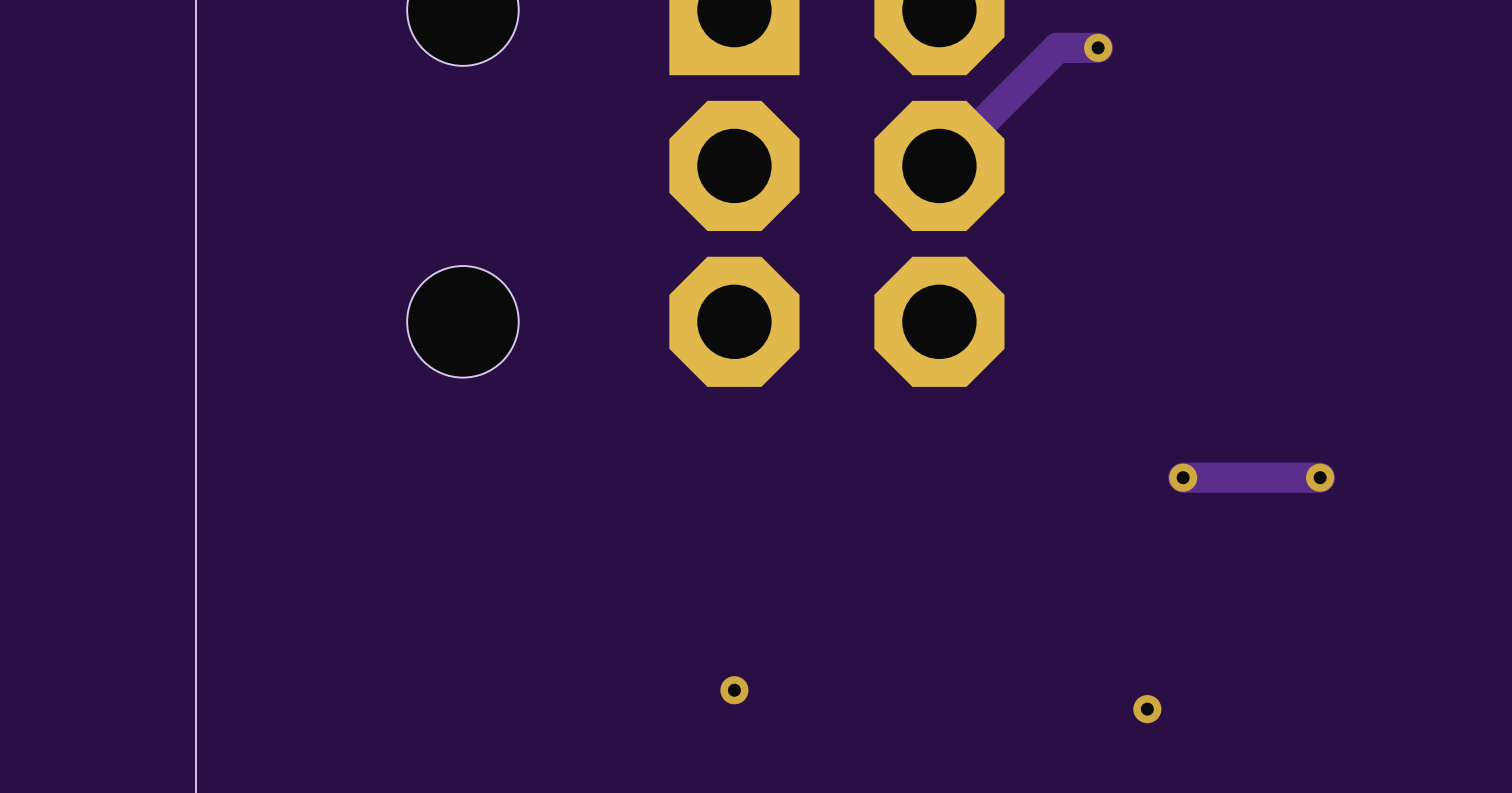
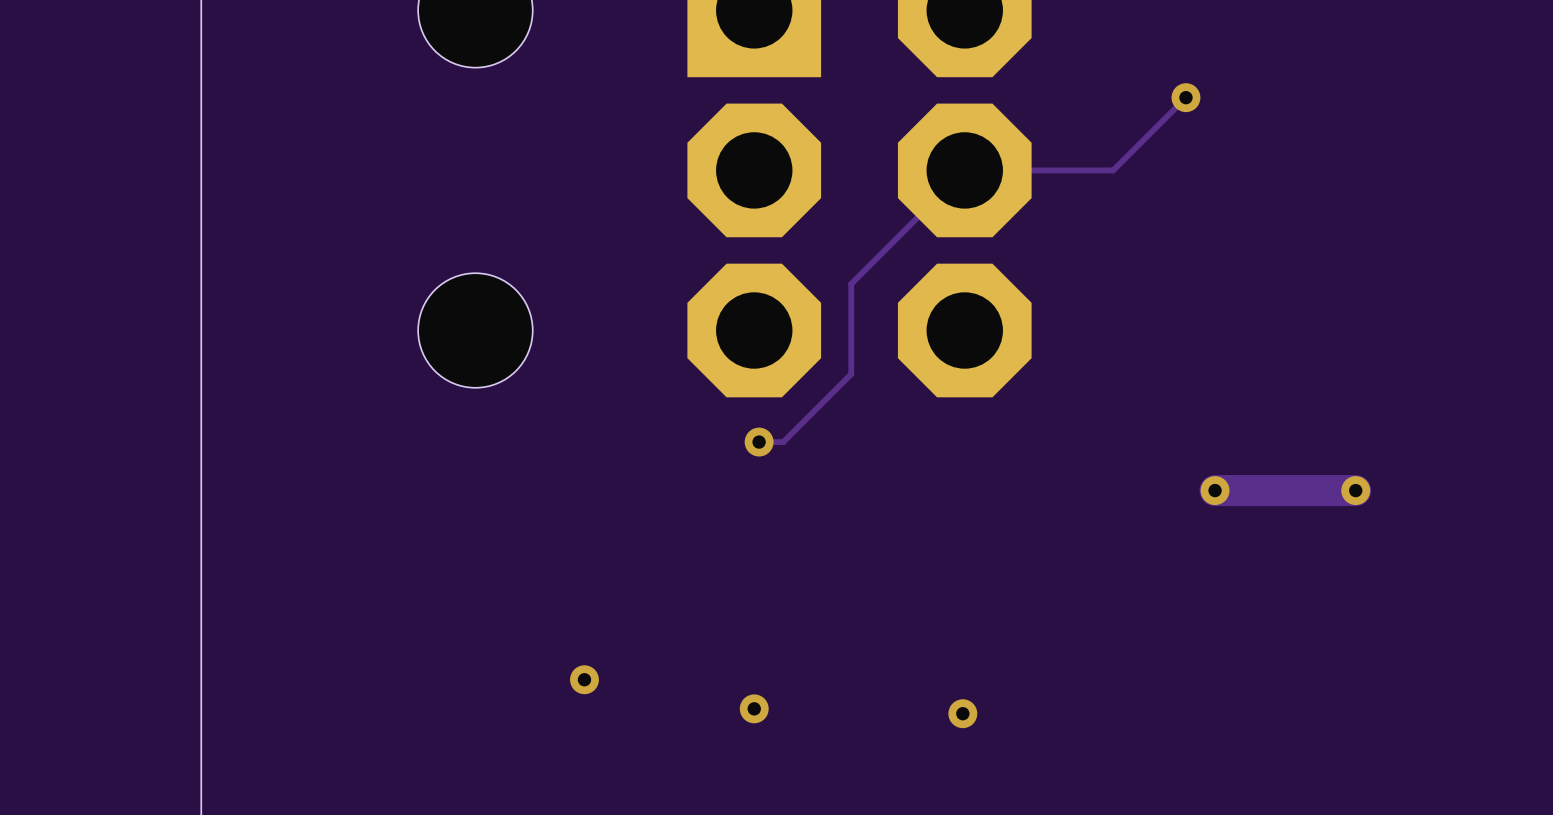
track: (1098, 47) (1057, 47) (939, 165) -> none
via position: (1098, 47) -> (1185, 97)
track: none -> (1185, 97) (1113, 170) (964, 170) (851, 283) (851, 374) (783, 442) (759, 442)
via: none -> (759, 442)
via: none -> (584, 679)
via position: (1147, 709) -> (962, 713)

